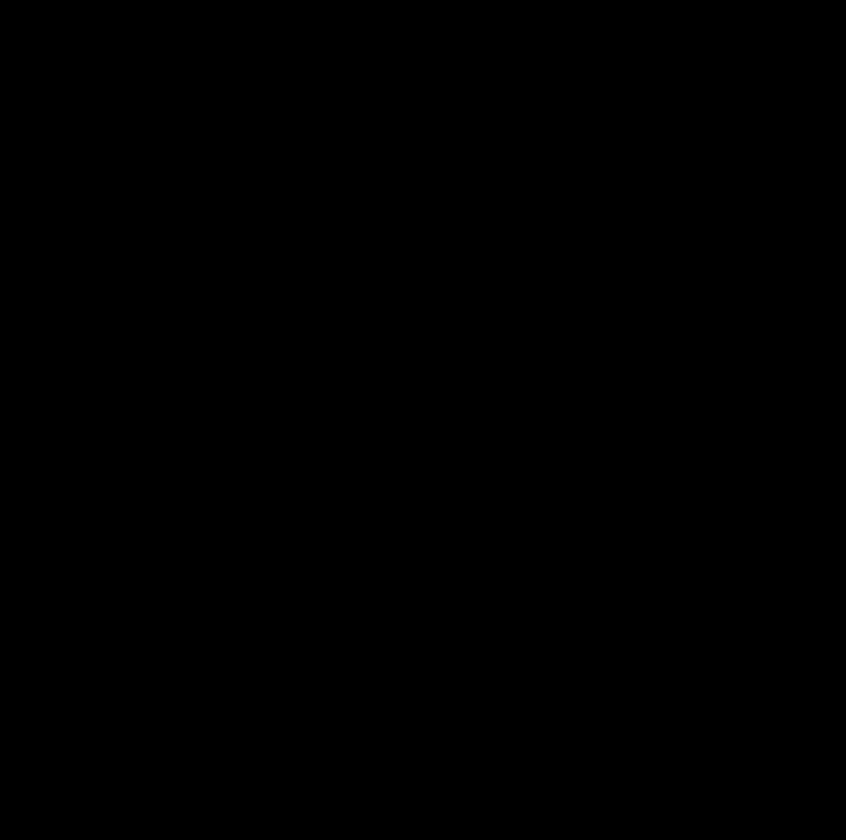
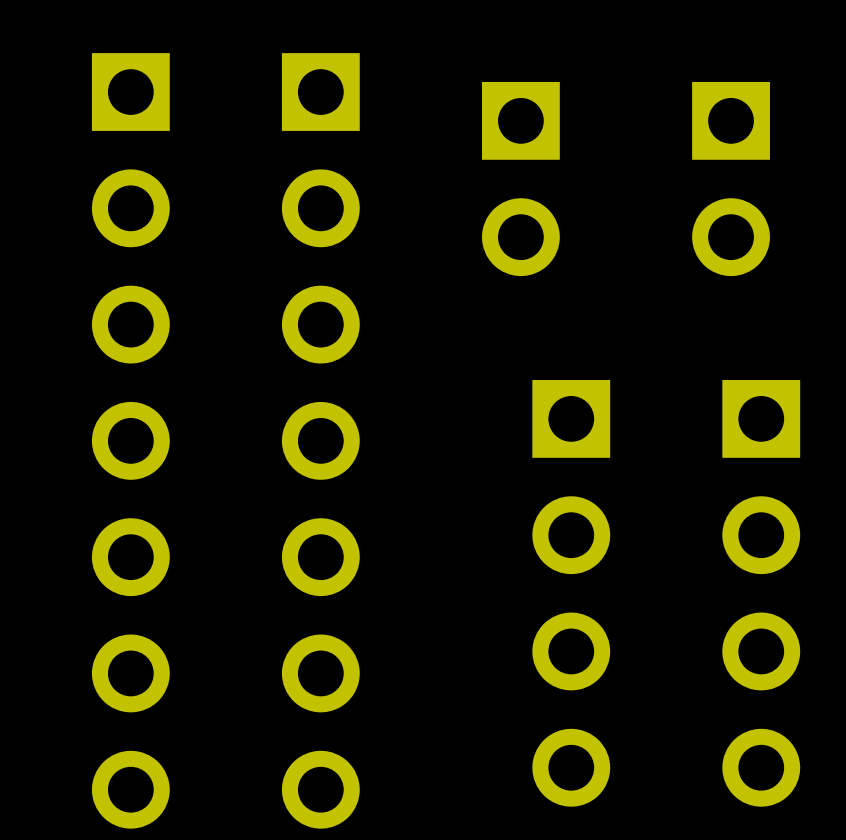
part: none -> (520, 179)
part: none -> (731, 179)
part: none -> (130, 440)
part: none -> (320, 440)
part: none -> (571, 593)
part: none -> (761, 593)

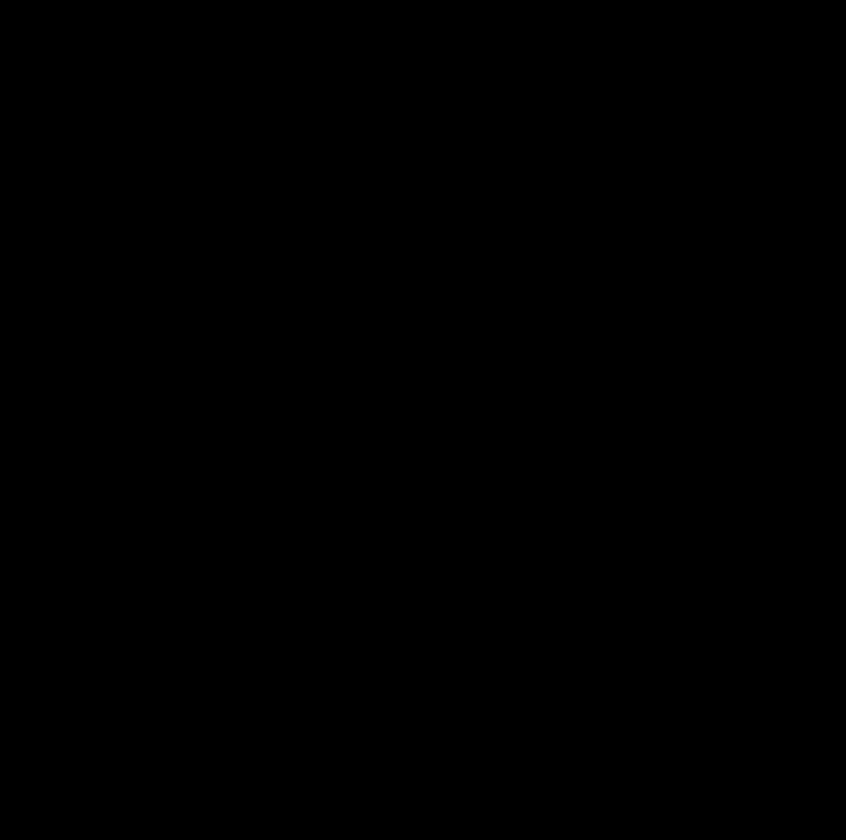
part: (520, 179) -> none
part: (731, 179) -> none
part: (130, 440) -> none
part: (320, 440) -> none
part: (571, 593) -> none
part: (761, 593) -> none

